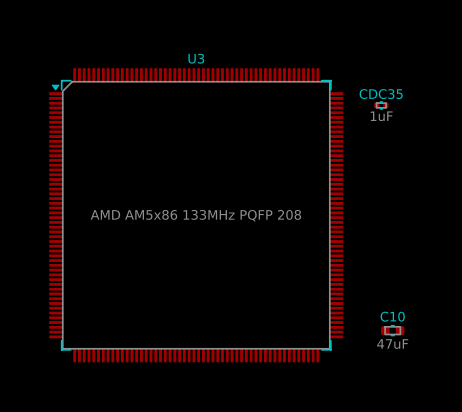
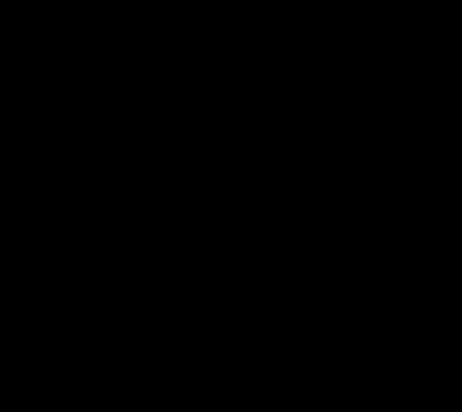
CDC35: 1uF (381, 105) -> none
U3: (196, 215) -> none
C10: 47uF (392, 330) -> none

